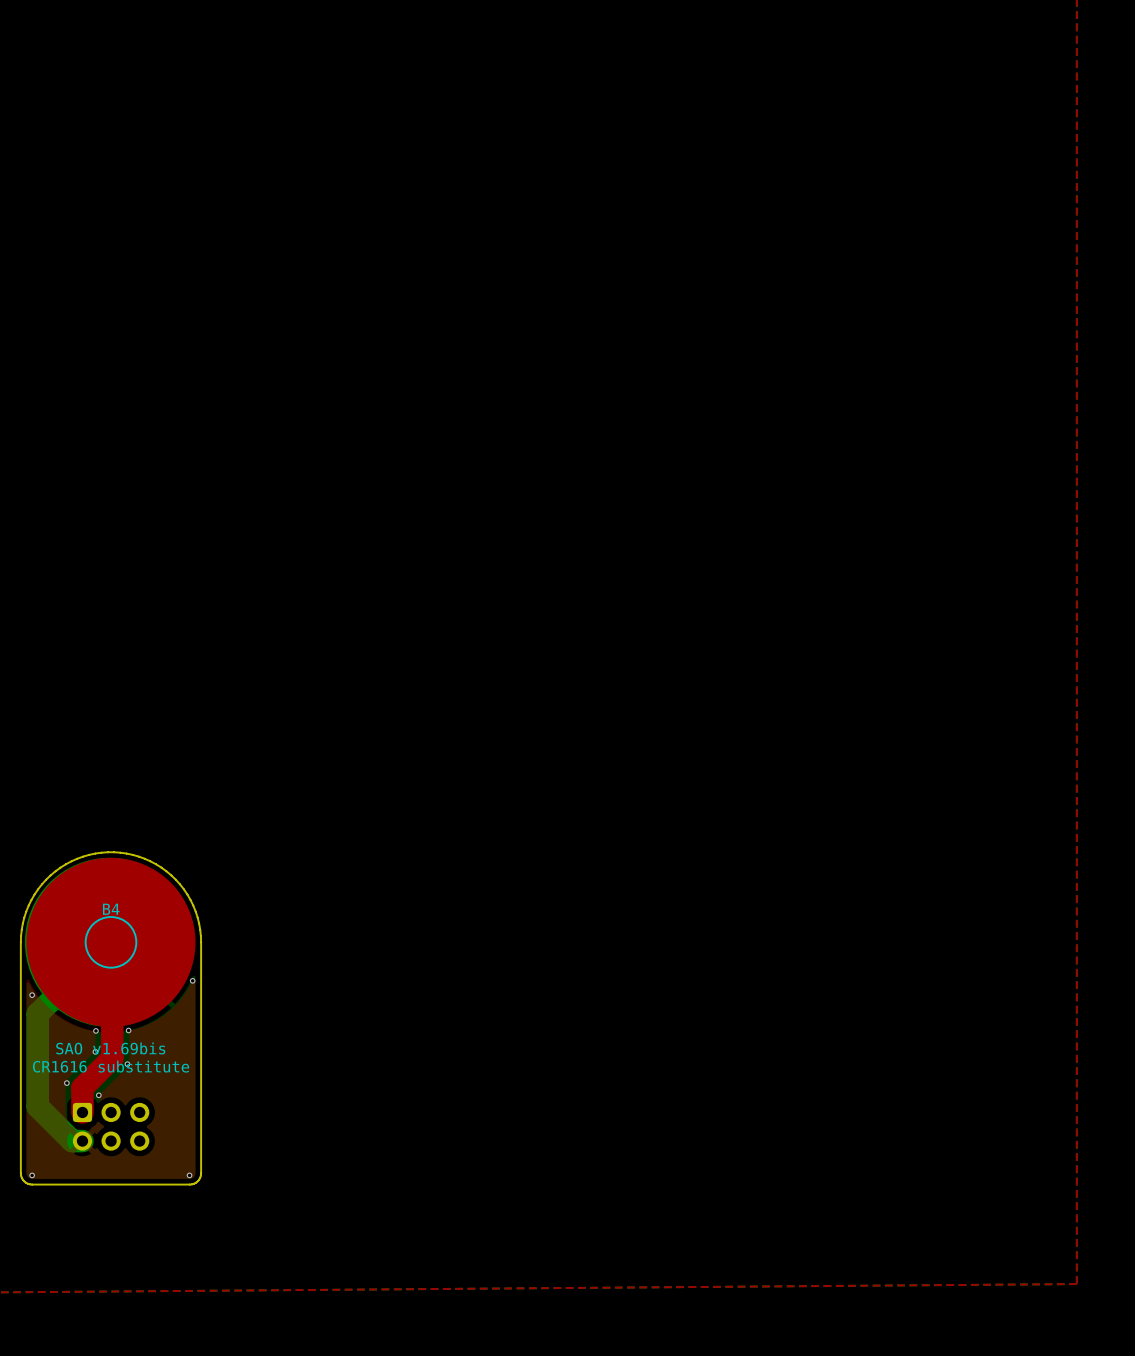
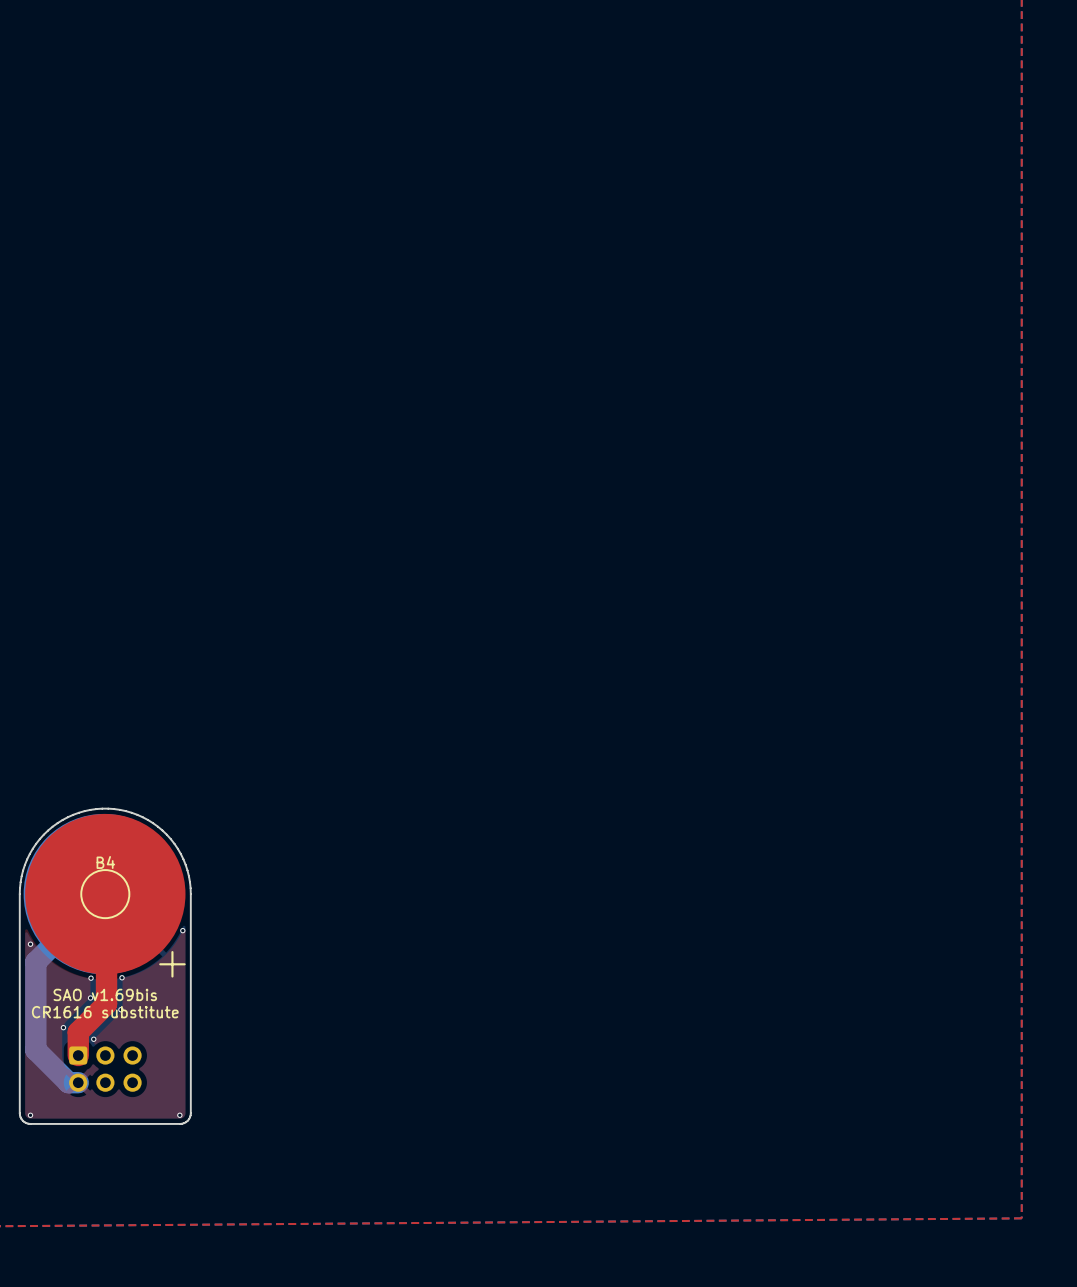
text: none -> + (172, 964)

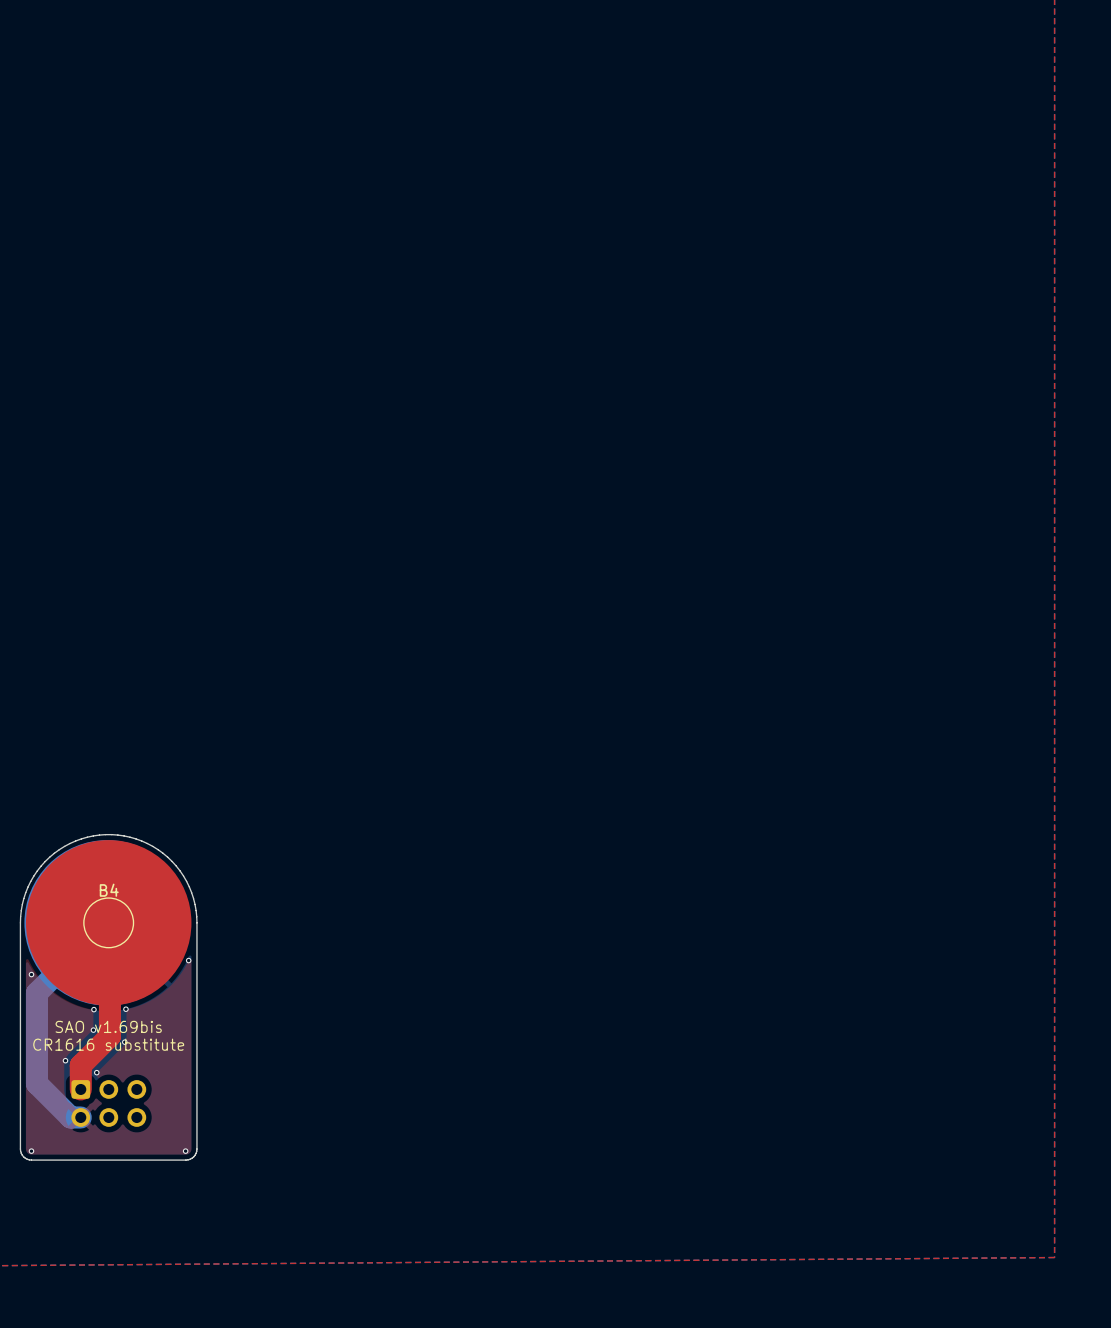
text: + (172, 964) -> none

